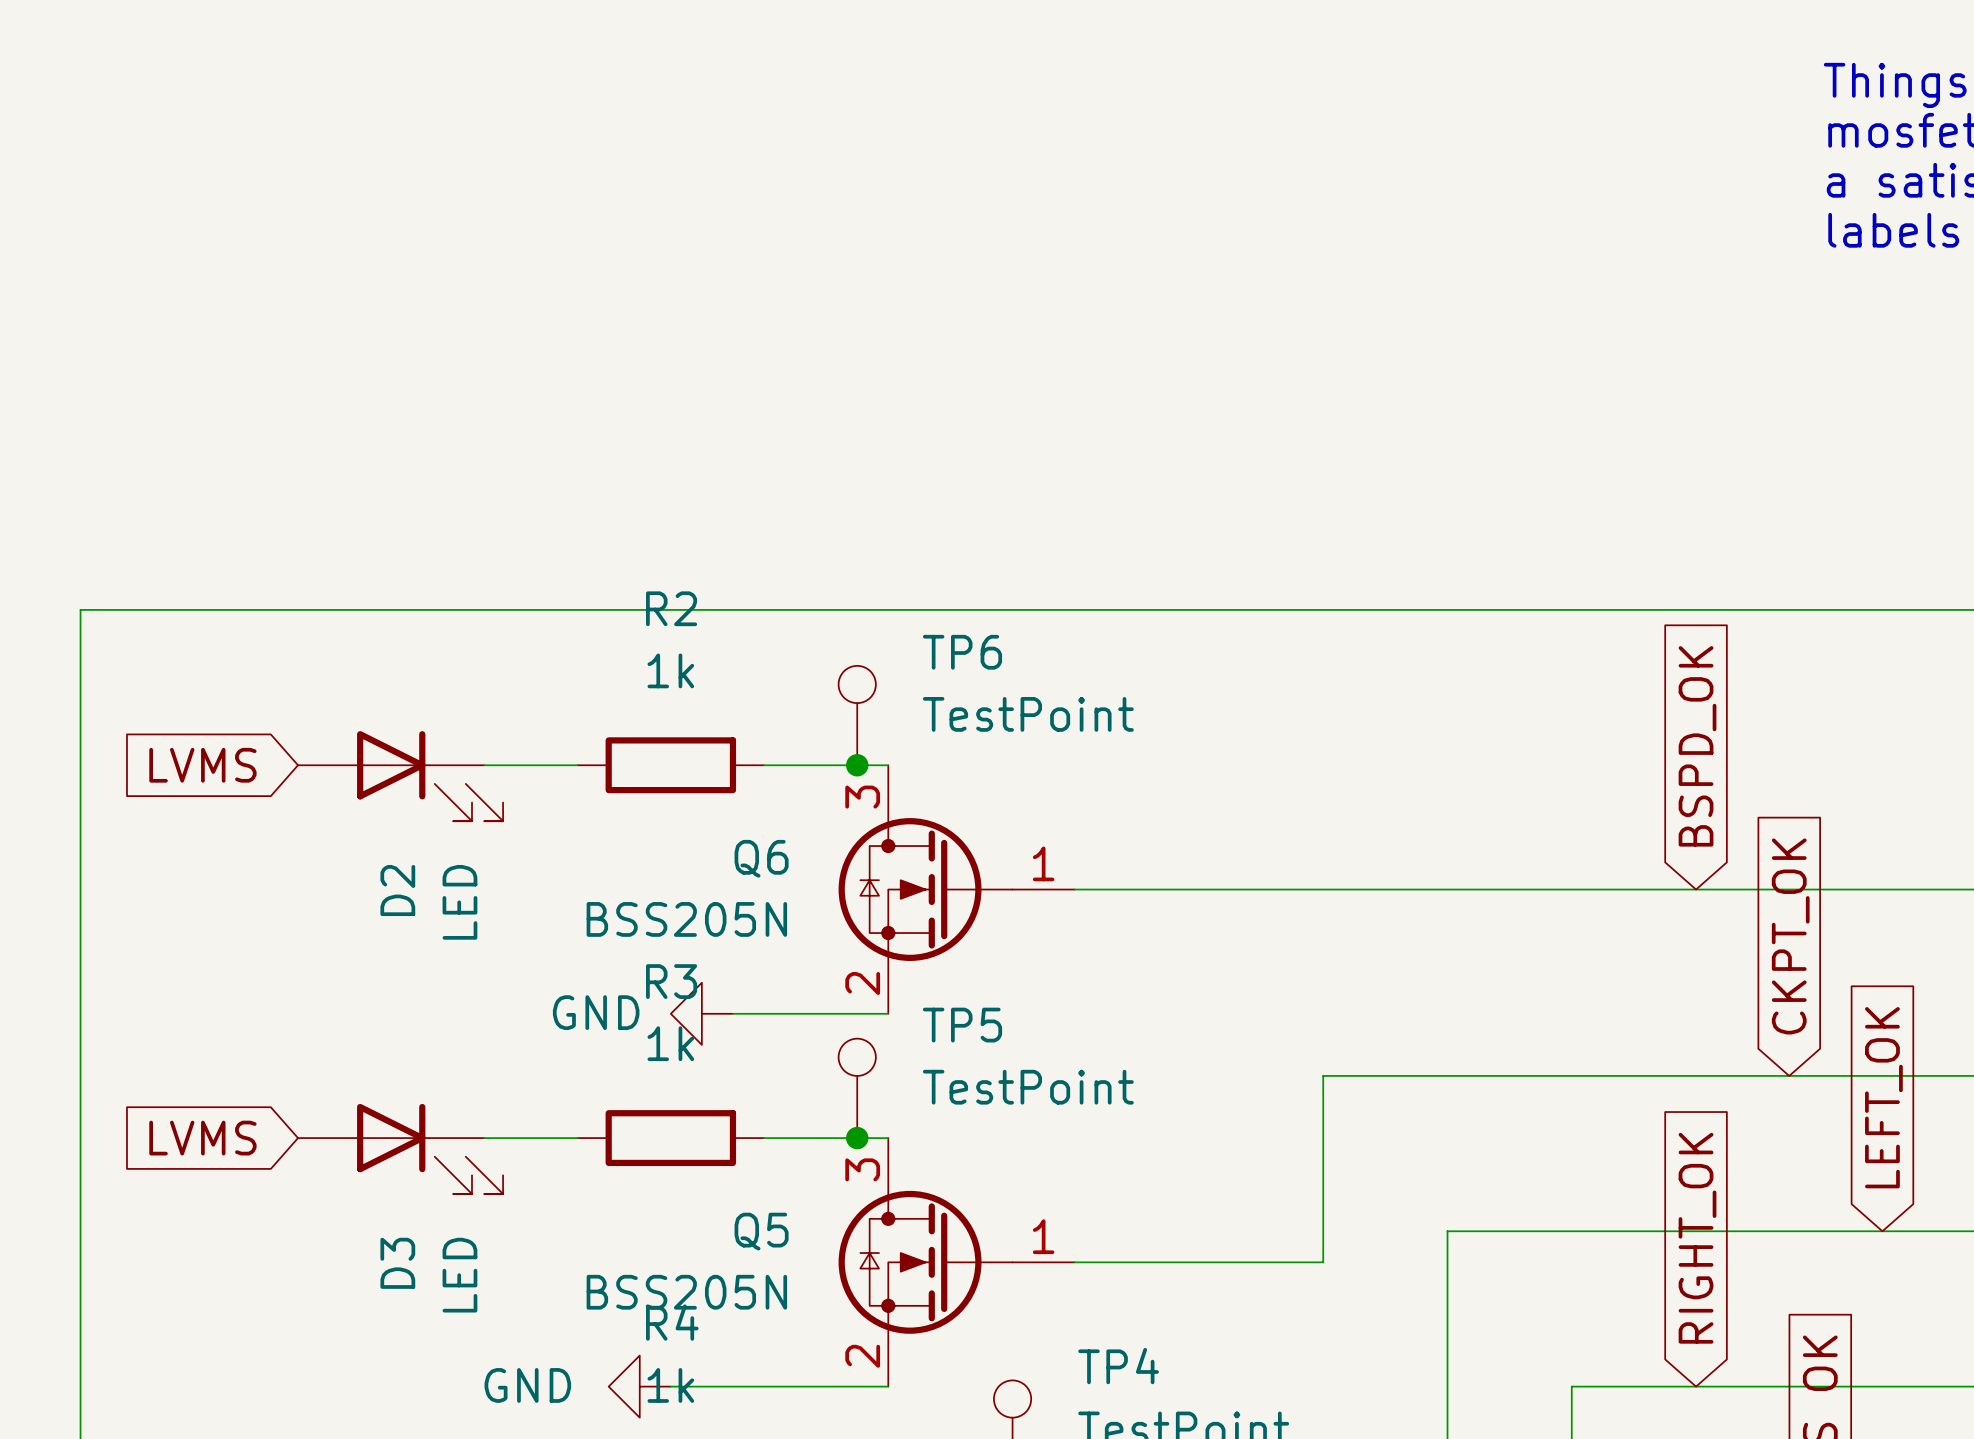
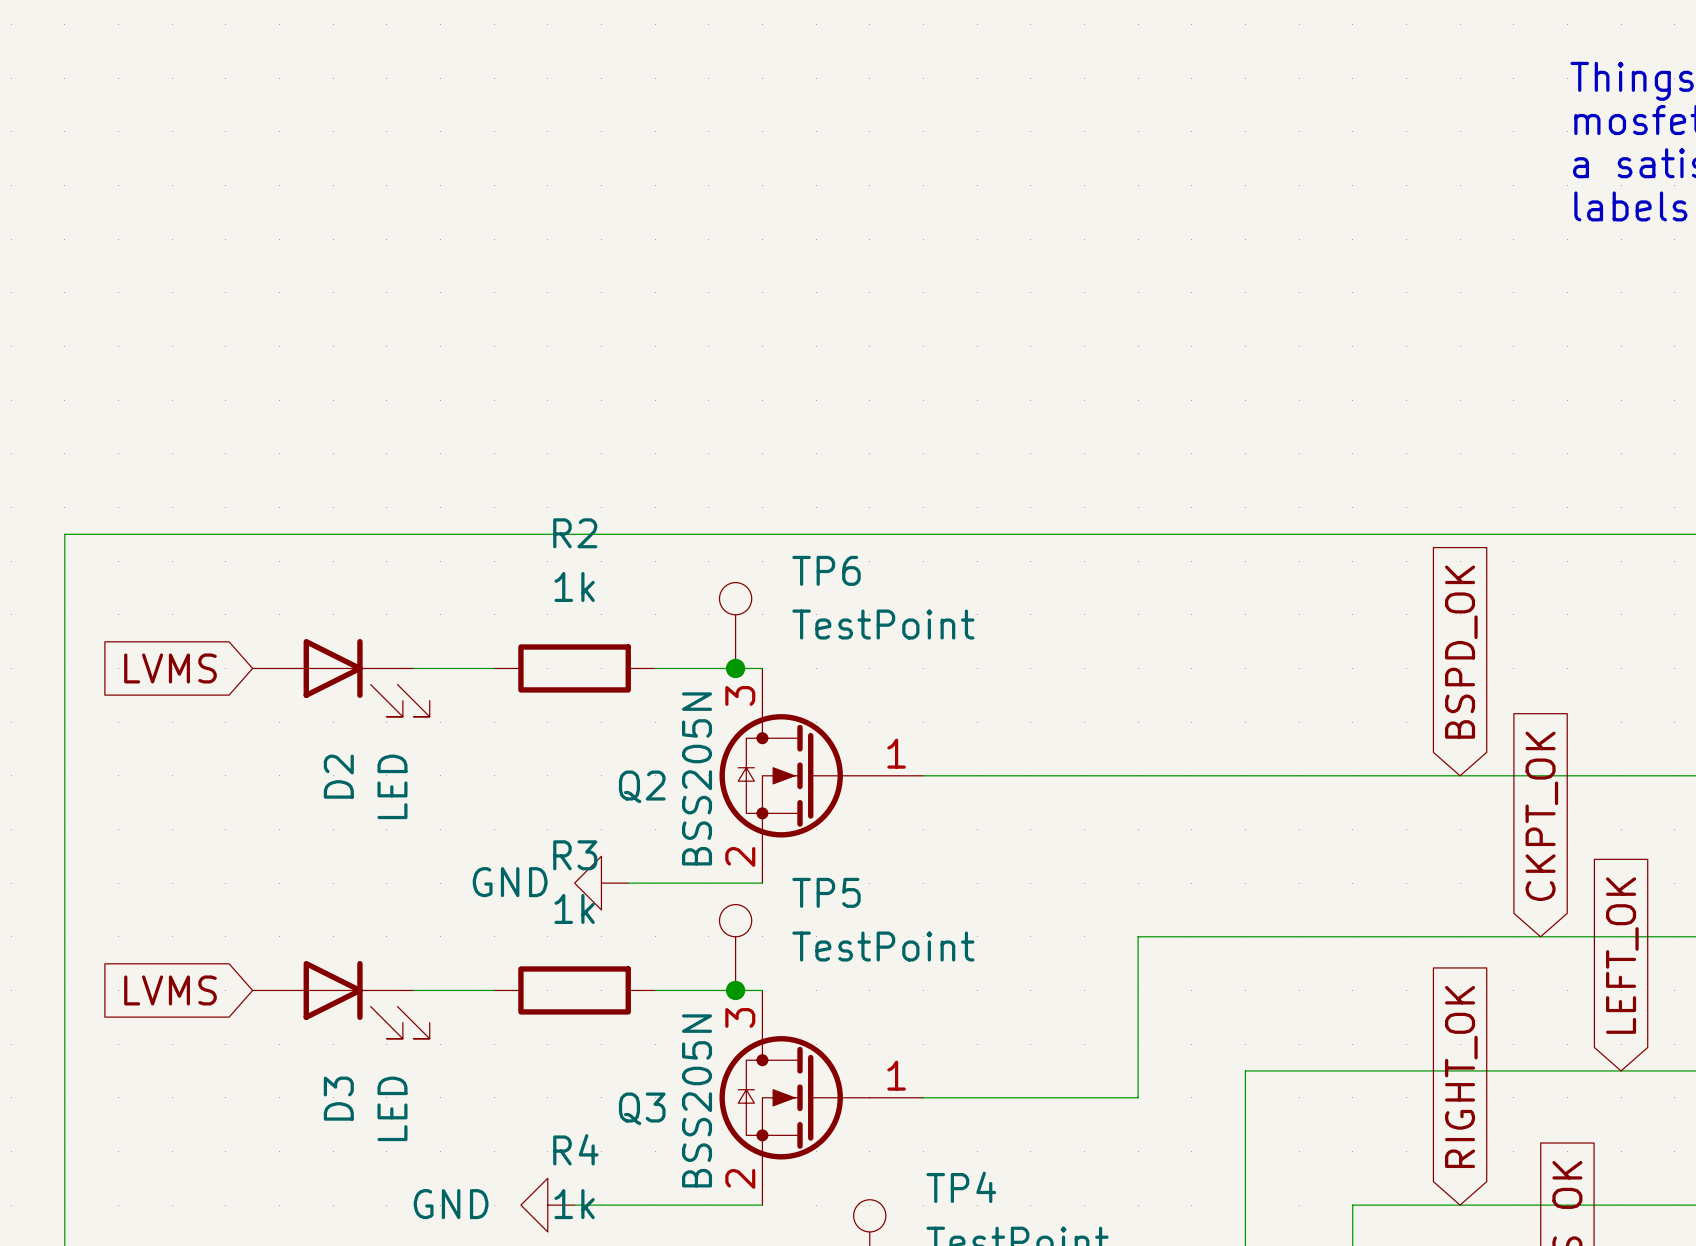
Q6 name: Q6 (761, 858) -> Q2 (642, 786)
Q6 value rotation: 0° (686, 919) -> 90° counterclockwise (697, 778)
Q5 name: Q5 (761, 1231) -> Q3 (642, 1108)
Q5 value rotation: 0° (686, 1292) -> 90° counterclockwise (697, 1100)

